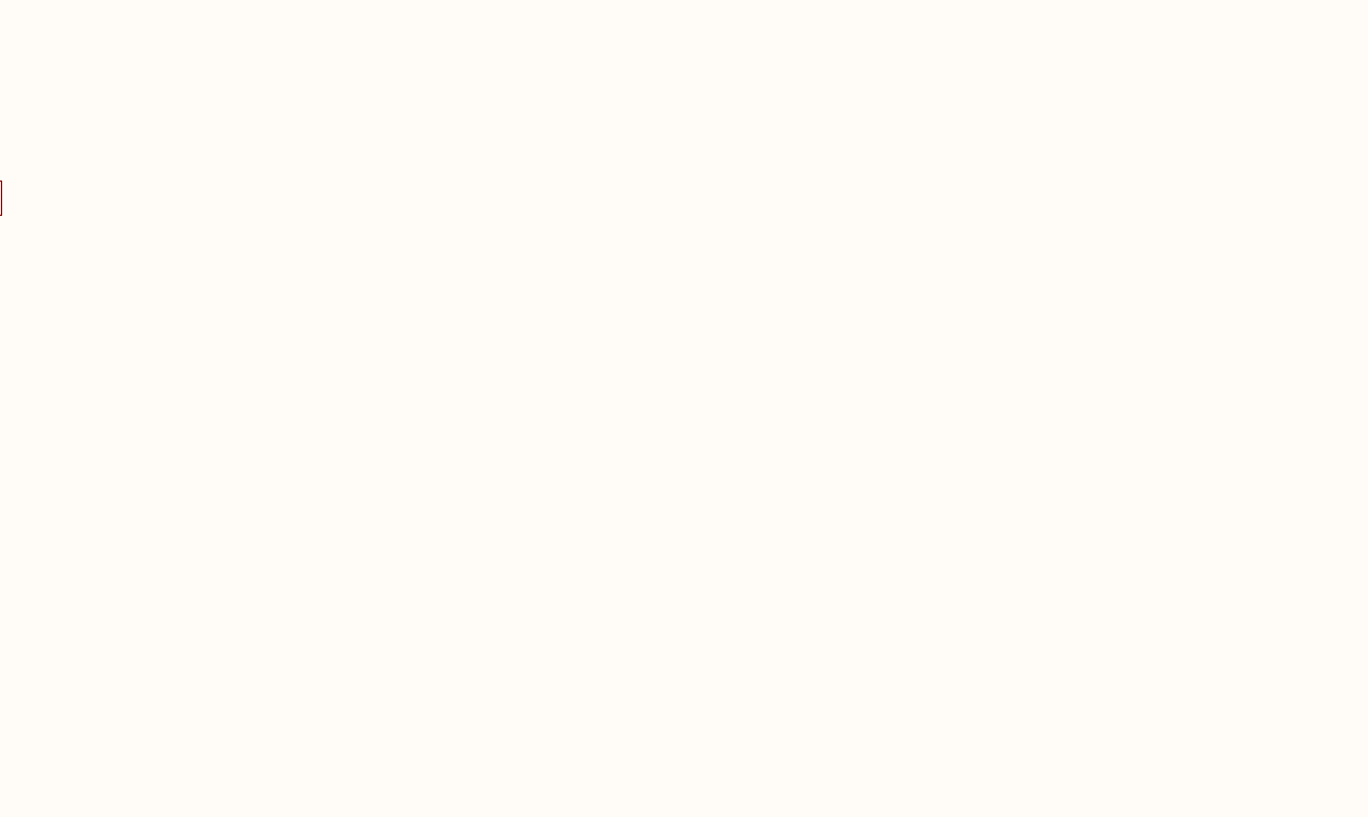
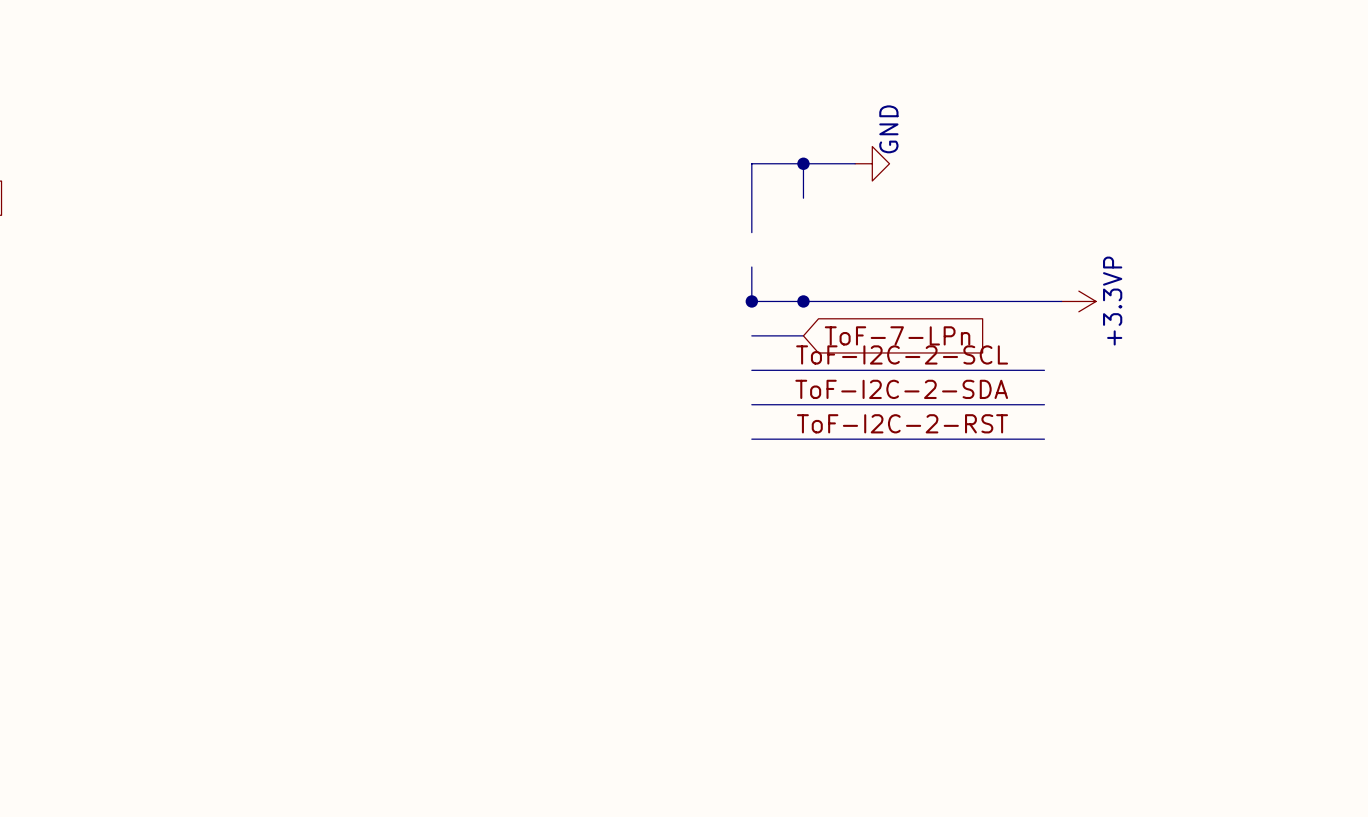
wire: none -> (803, 163) (803, 198)
junction: none -> (803, 163)
wire: none -> (855, 163) (751, 163) (751, 232)
power symbol: none -> GND (872, 163)
wire: none -> (751, 267) (751, 301) (1061, 301)
junction: none -> (751, 301)
junction: none -> (803, 301)
power symbol: none -> +3.3VP (1078, 301)
wire: none -> (751, 335) (803, 335)
global label: none -> ToF-7-LPn (897, 335)
label: none -> ToF-I2C-2-SCL (902, 354)
wire: none -> (751, 370) (1044, 370)
label: none -> ToF-I2C-2-SDA (901, 389)
wire: none -> (751, 404) (1044, 404)
label: none -> ToF-I2C-2-RST (902, 423)
wire: none -> (751, 439) (1044, 439)

